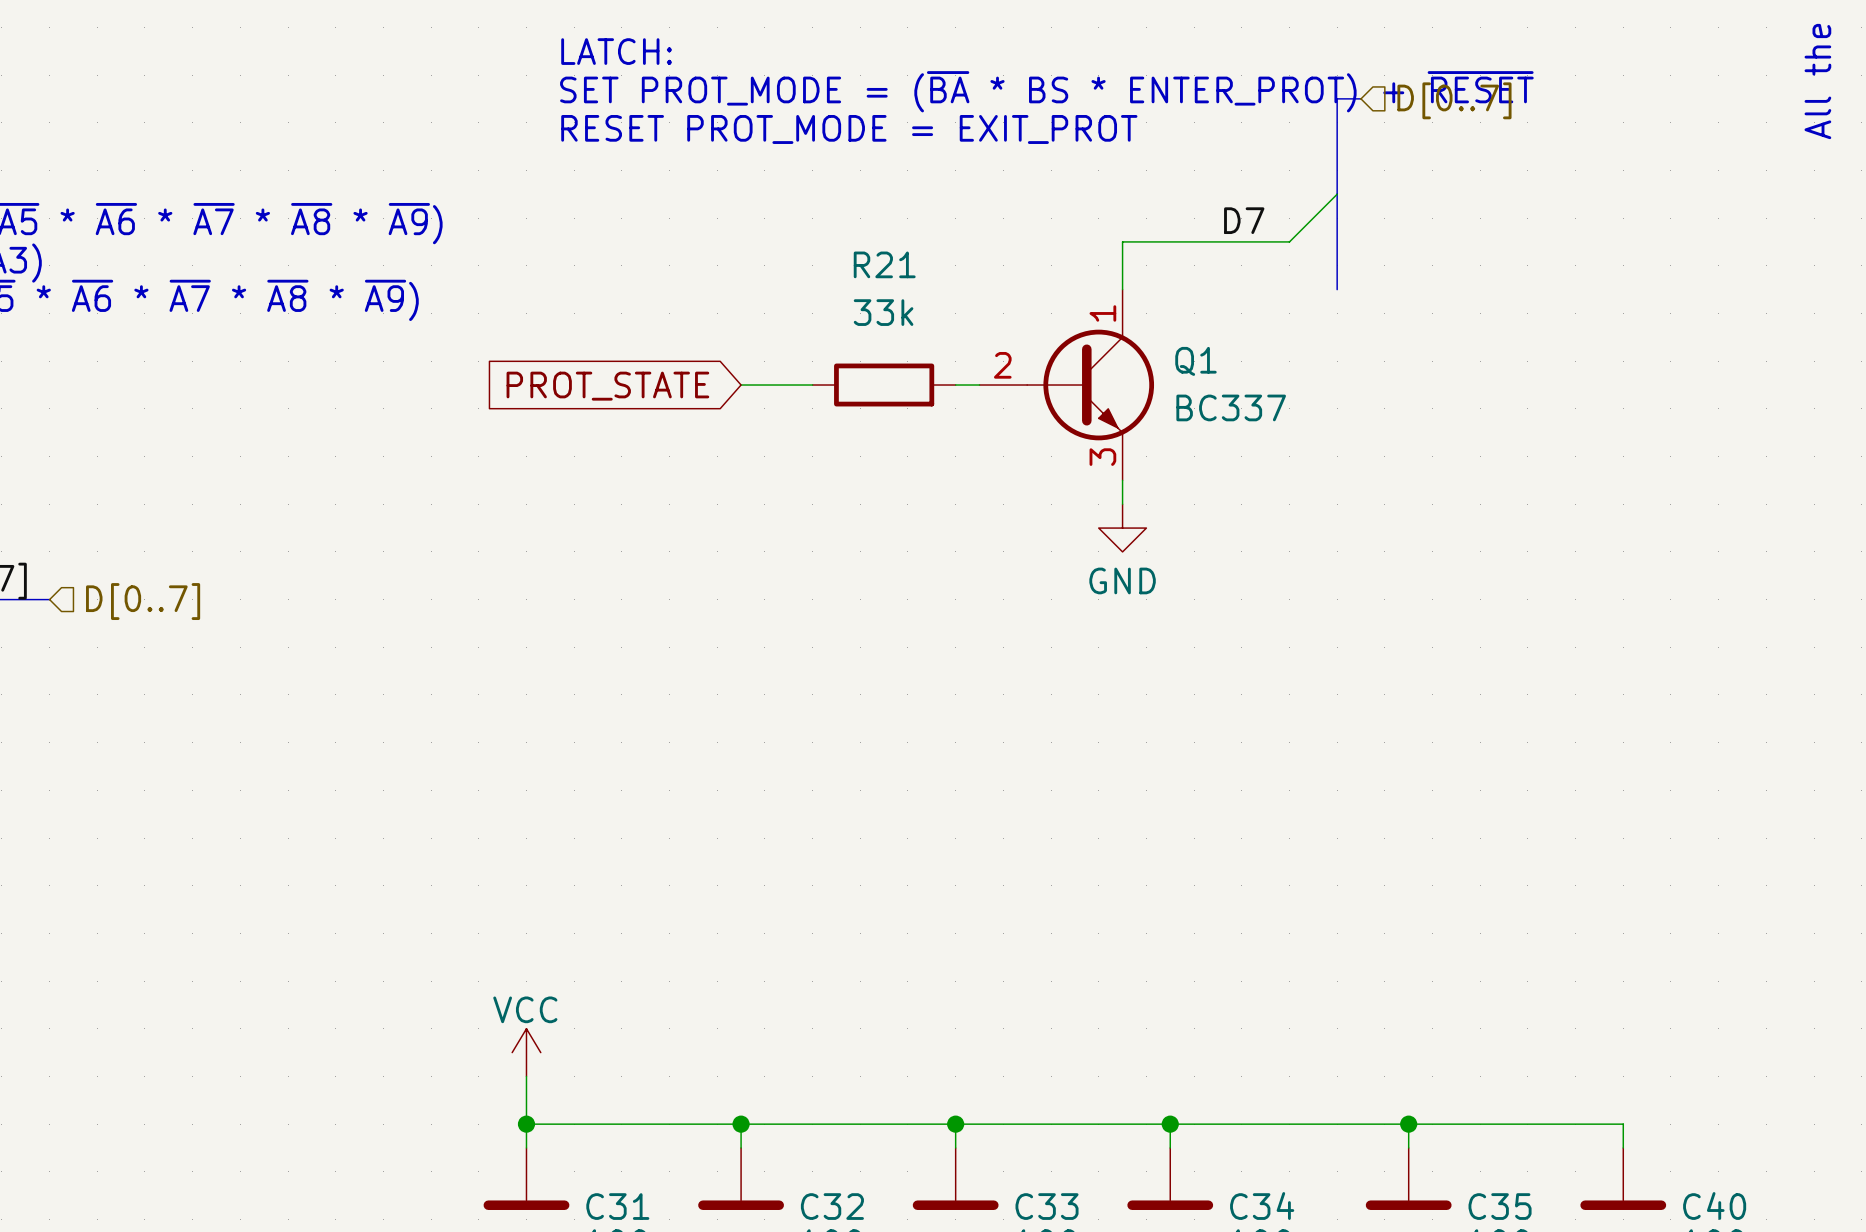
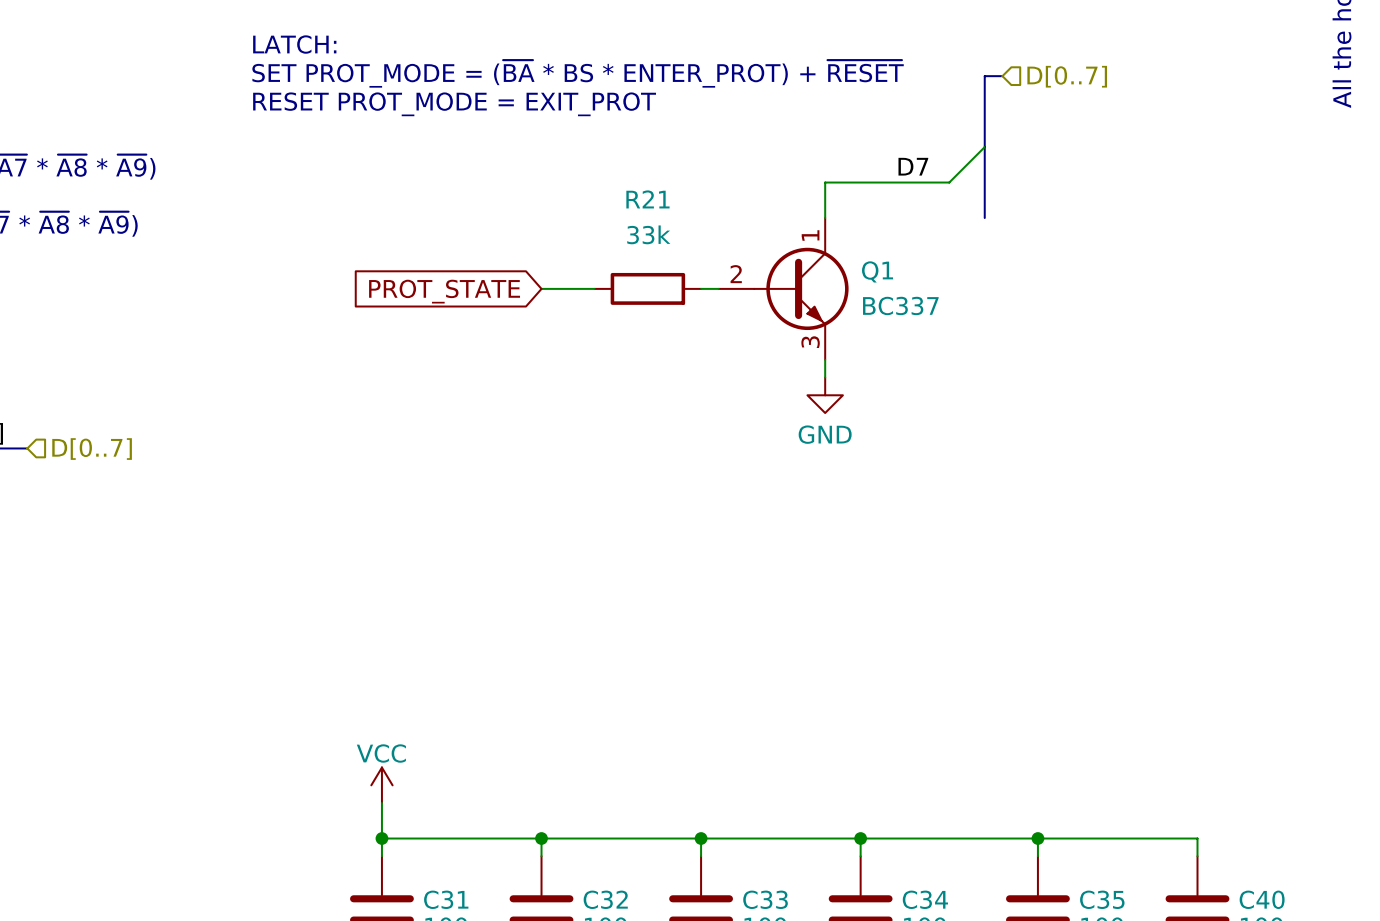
text position: LATCH: (616, 51) -> LATCH: (294, 44)
text position: SET PROT_MODE = (~{BA} * BS * ENTER_PROT) + ~{RESET} (1046, 91) -> SET PROT_MODE = (~{BA} * BS * ENTER_PROT) + ~{RESET} (578, 73)
text position: RESET PROT_MODE = EXIT_PROT (849, 129) -> RESET PROT_MODE = EXIT_PROT (454, 104)

